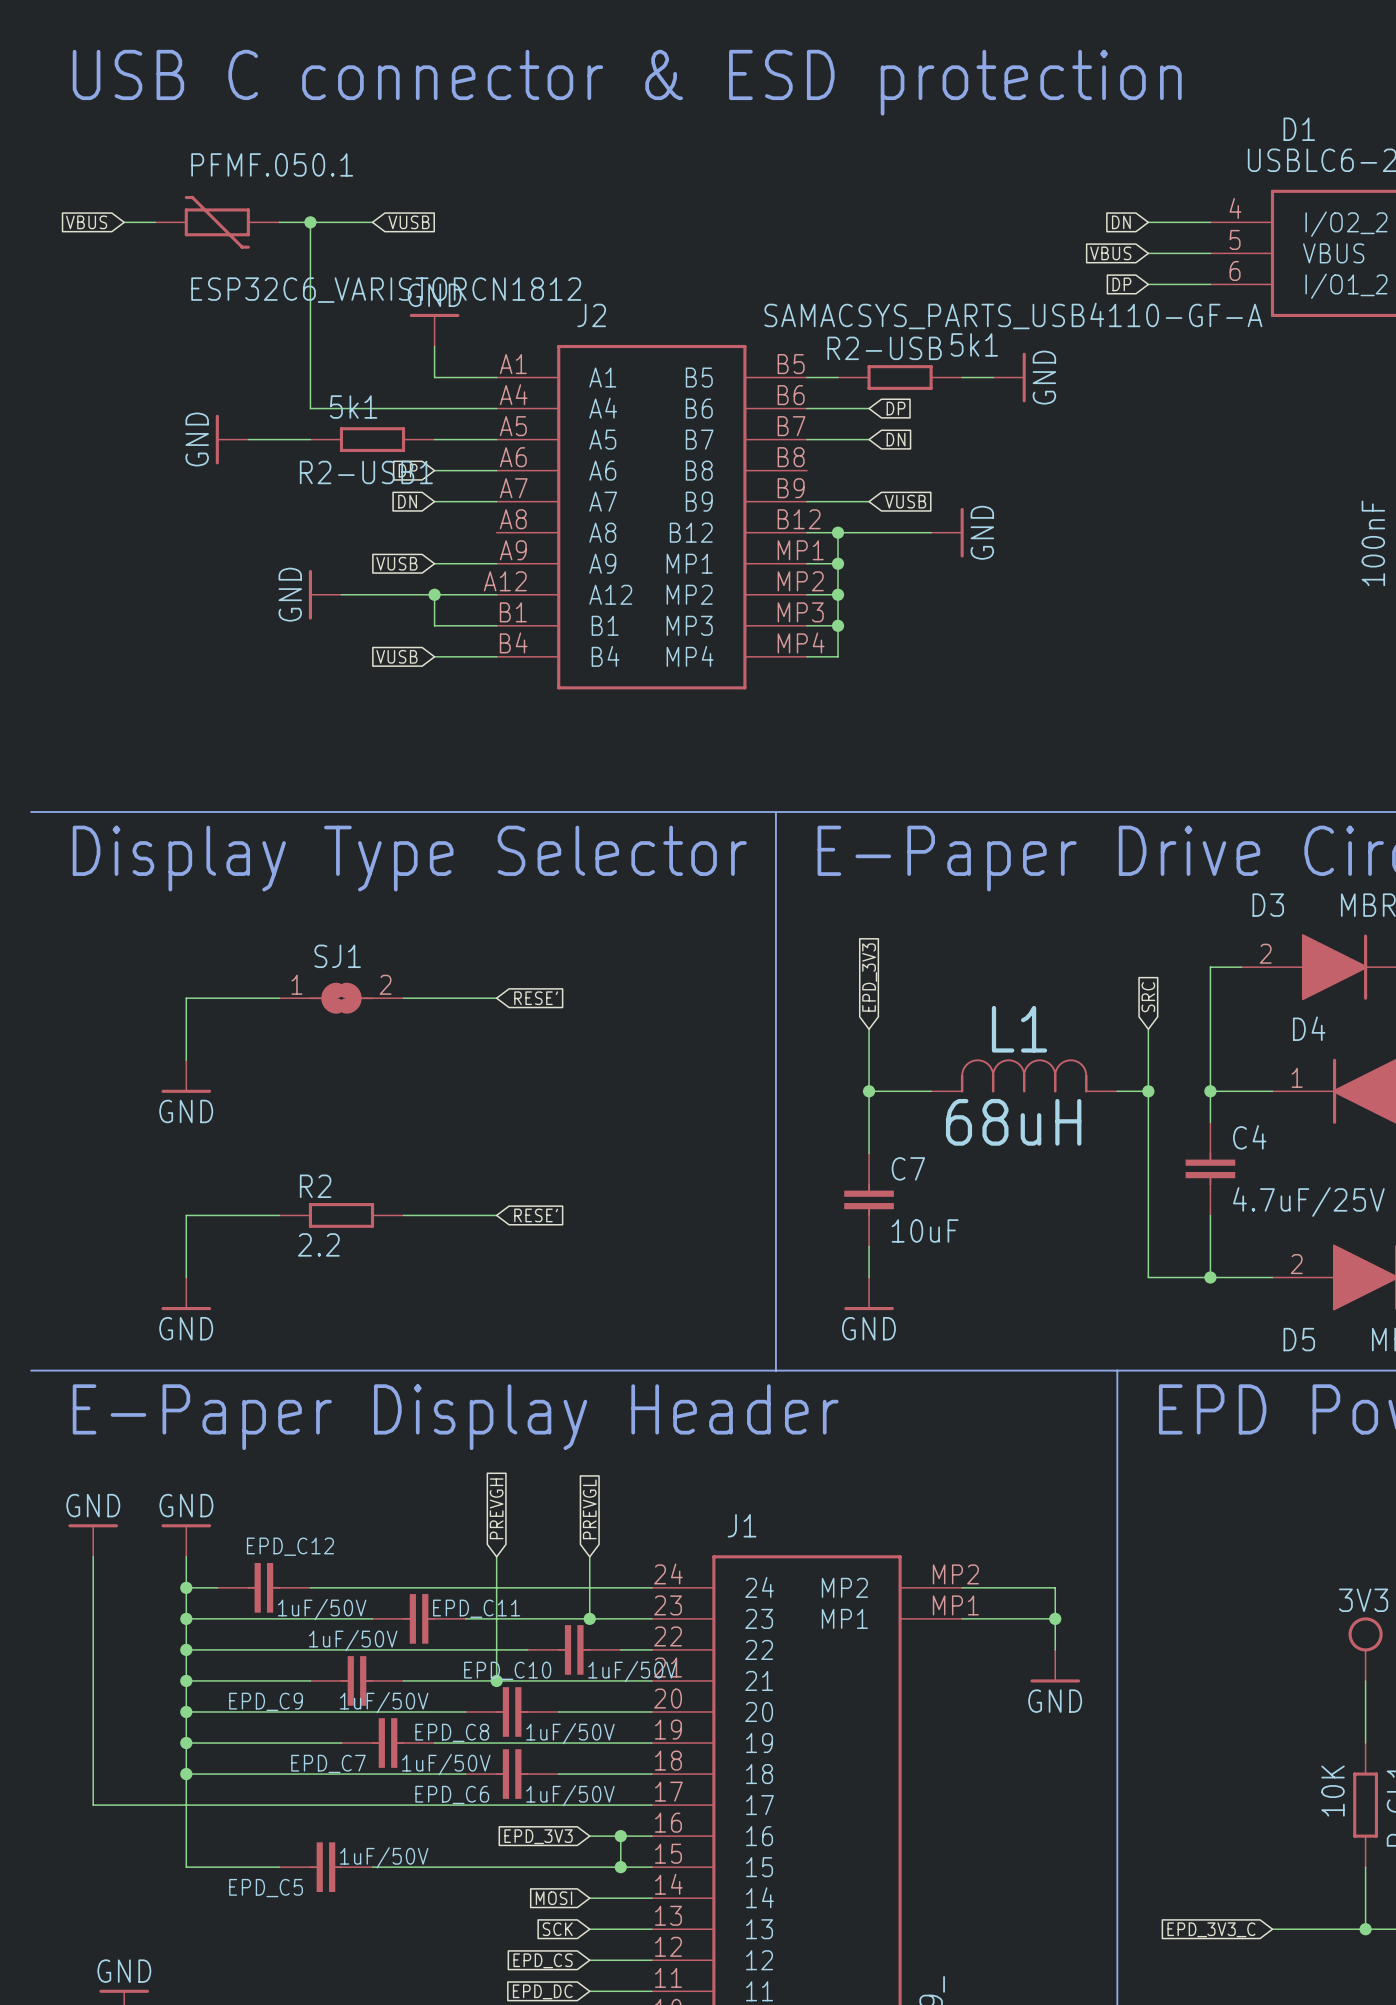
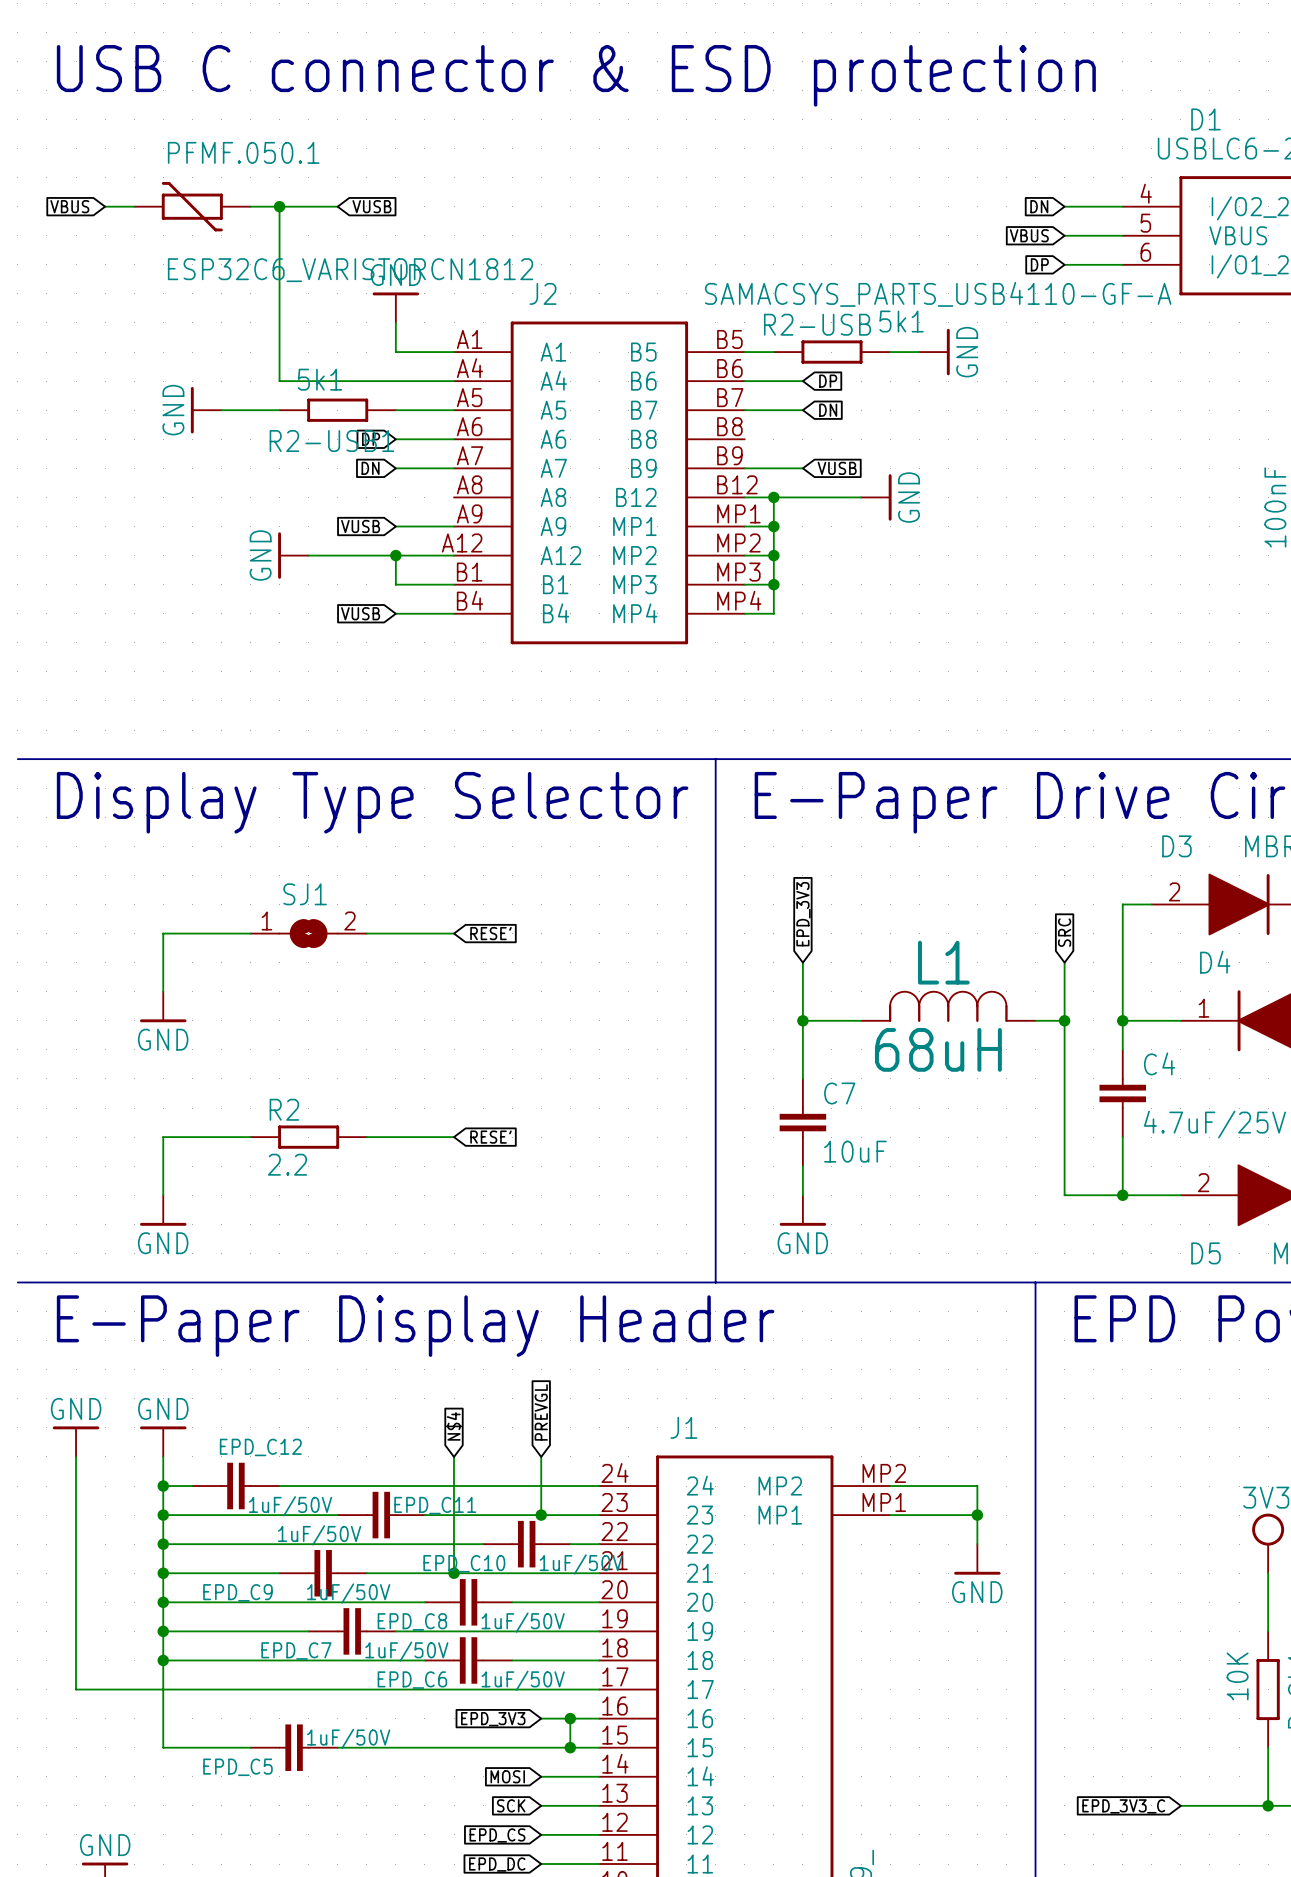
global label: PREVGH (496, 1508) -> N$4 (454, 1426)

